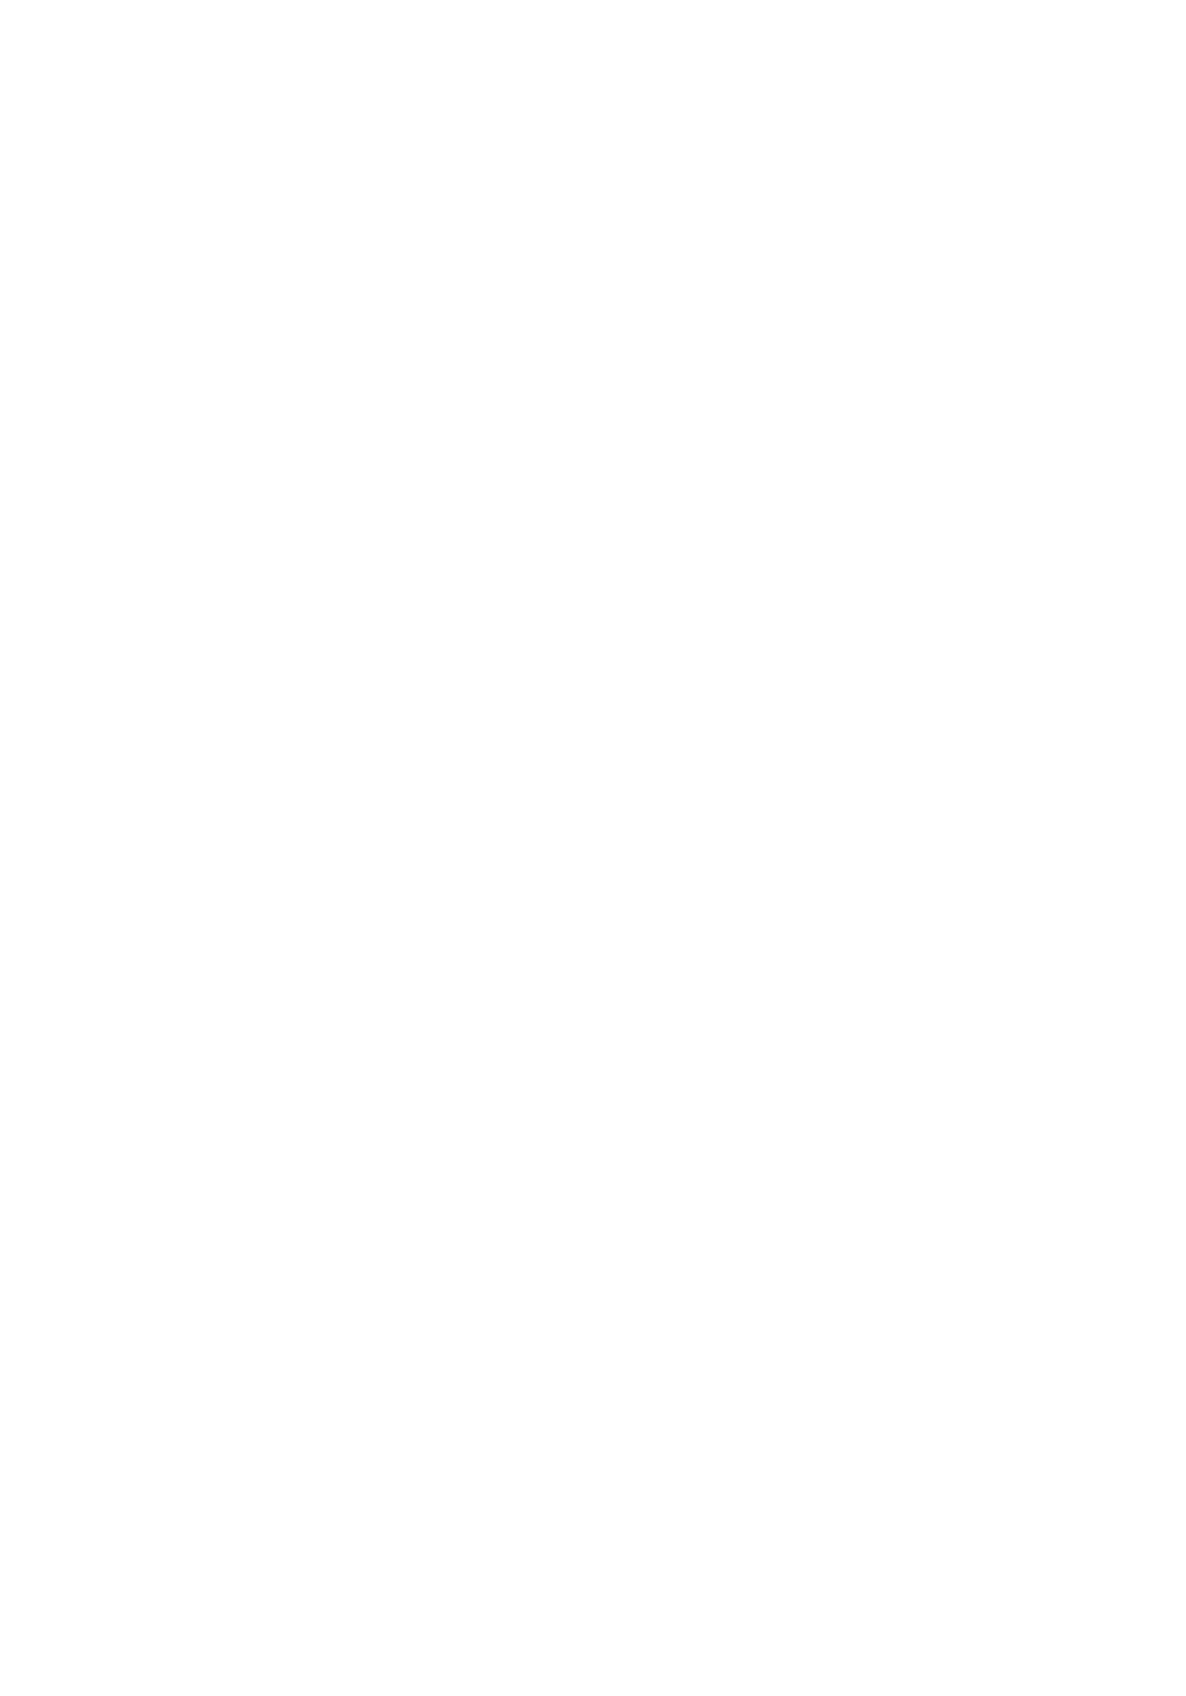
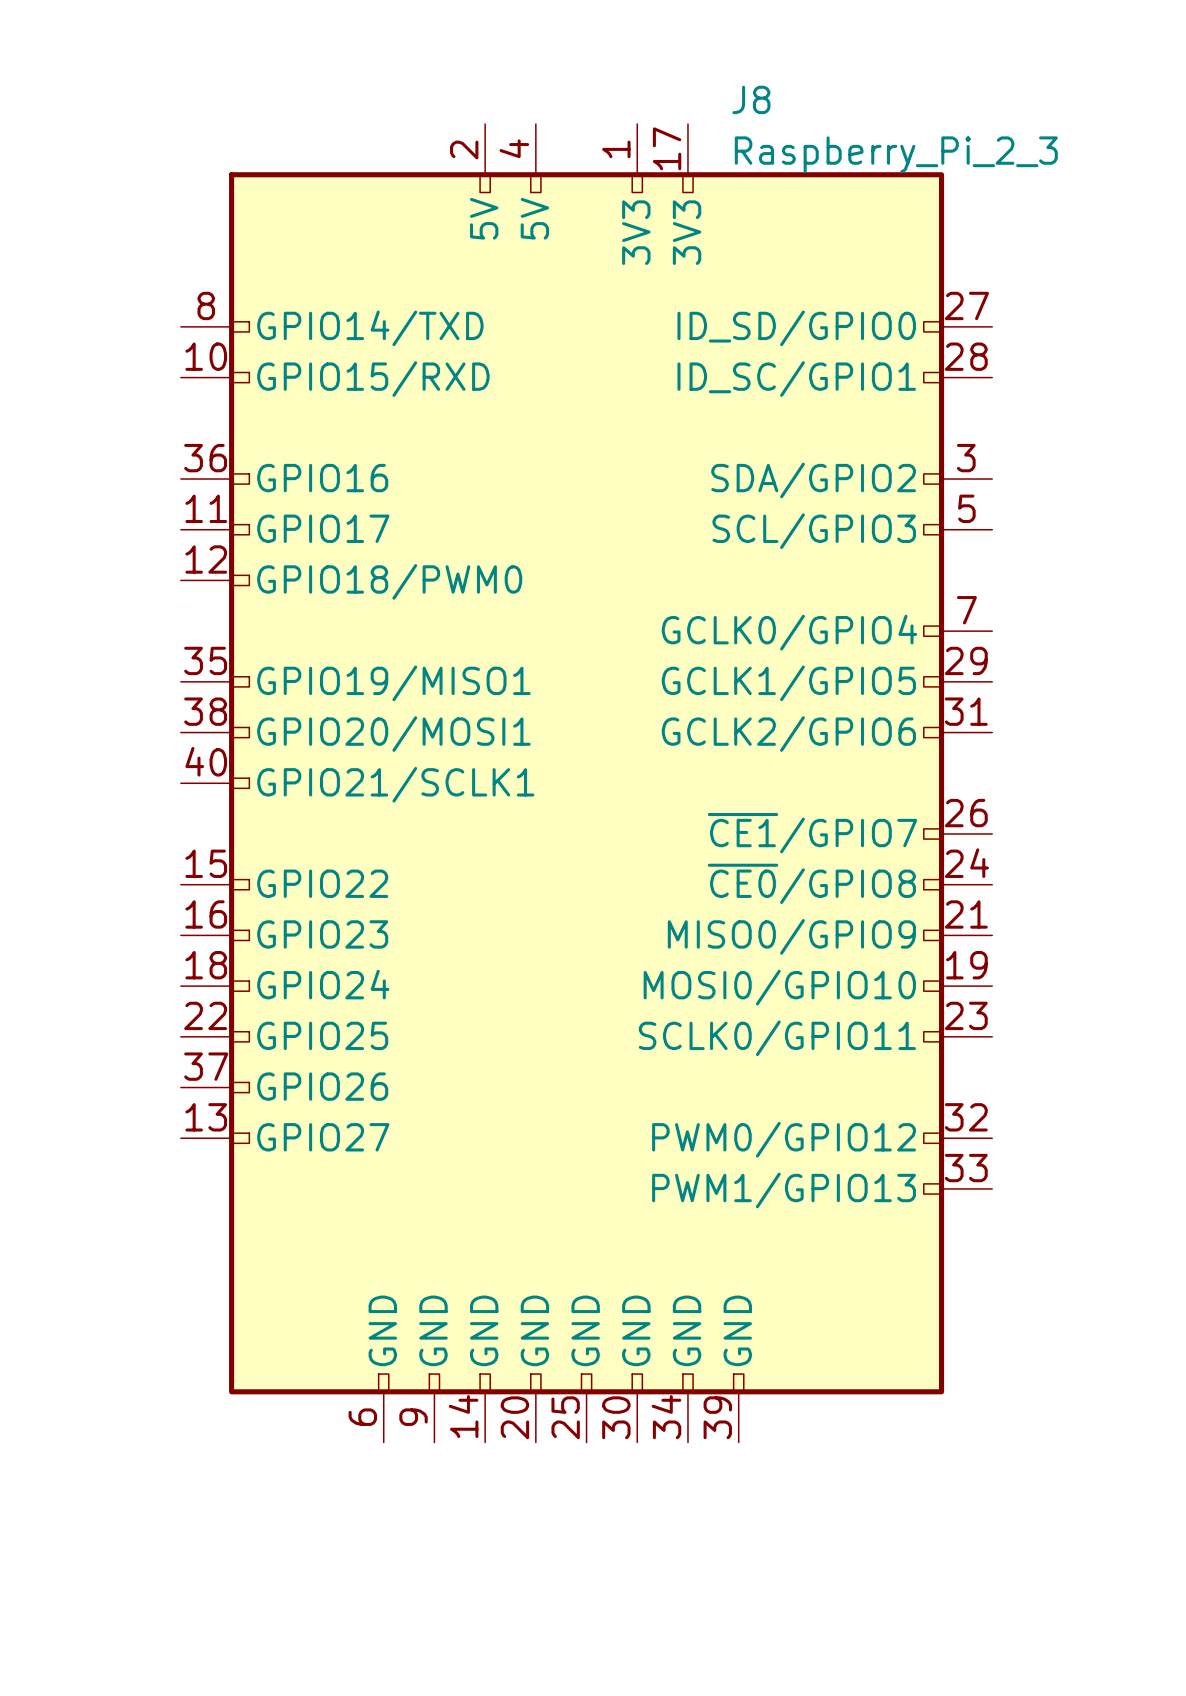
J8: none -> Raspberry_Pi_2_3 (586, 783)

